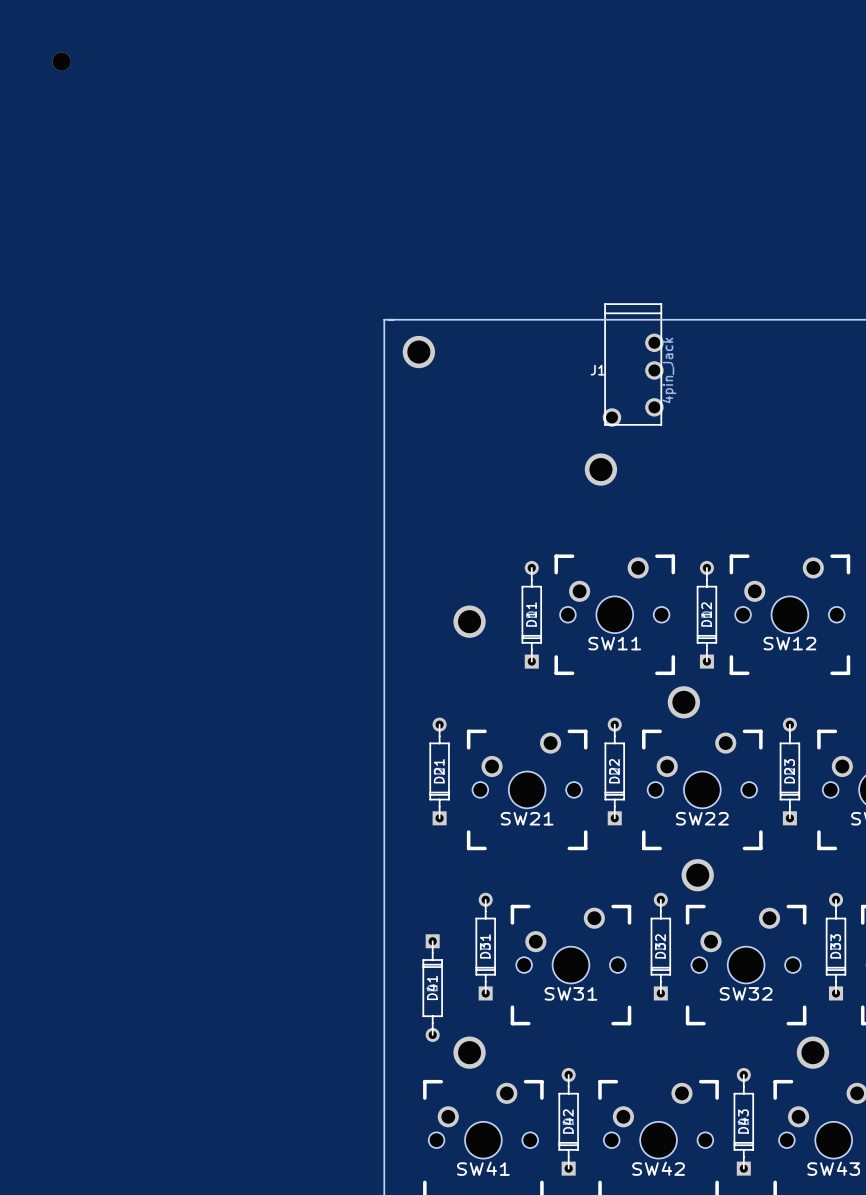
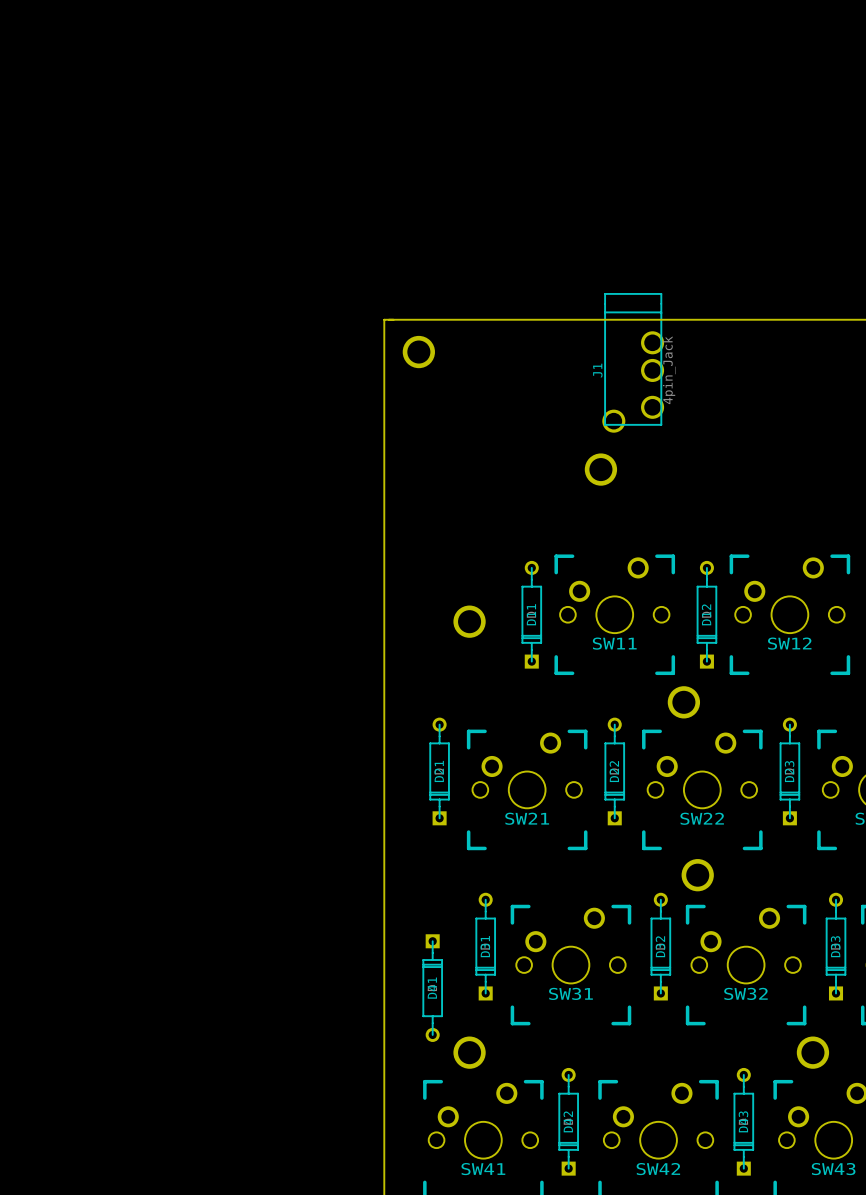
part: (61, 61) -> none
J1 footprint: [602, 303, 664, 427] -> [602, 293, 665, 433]

